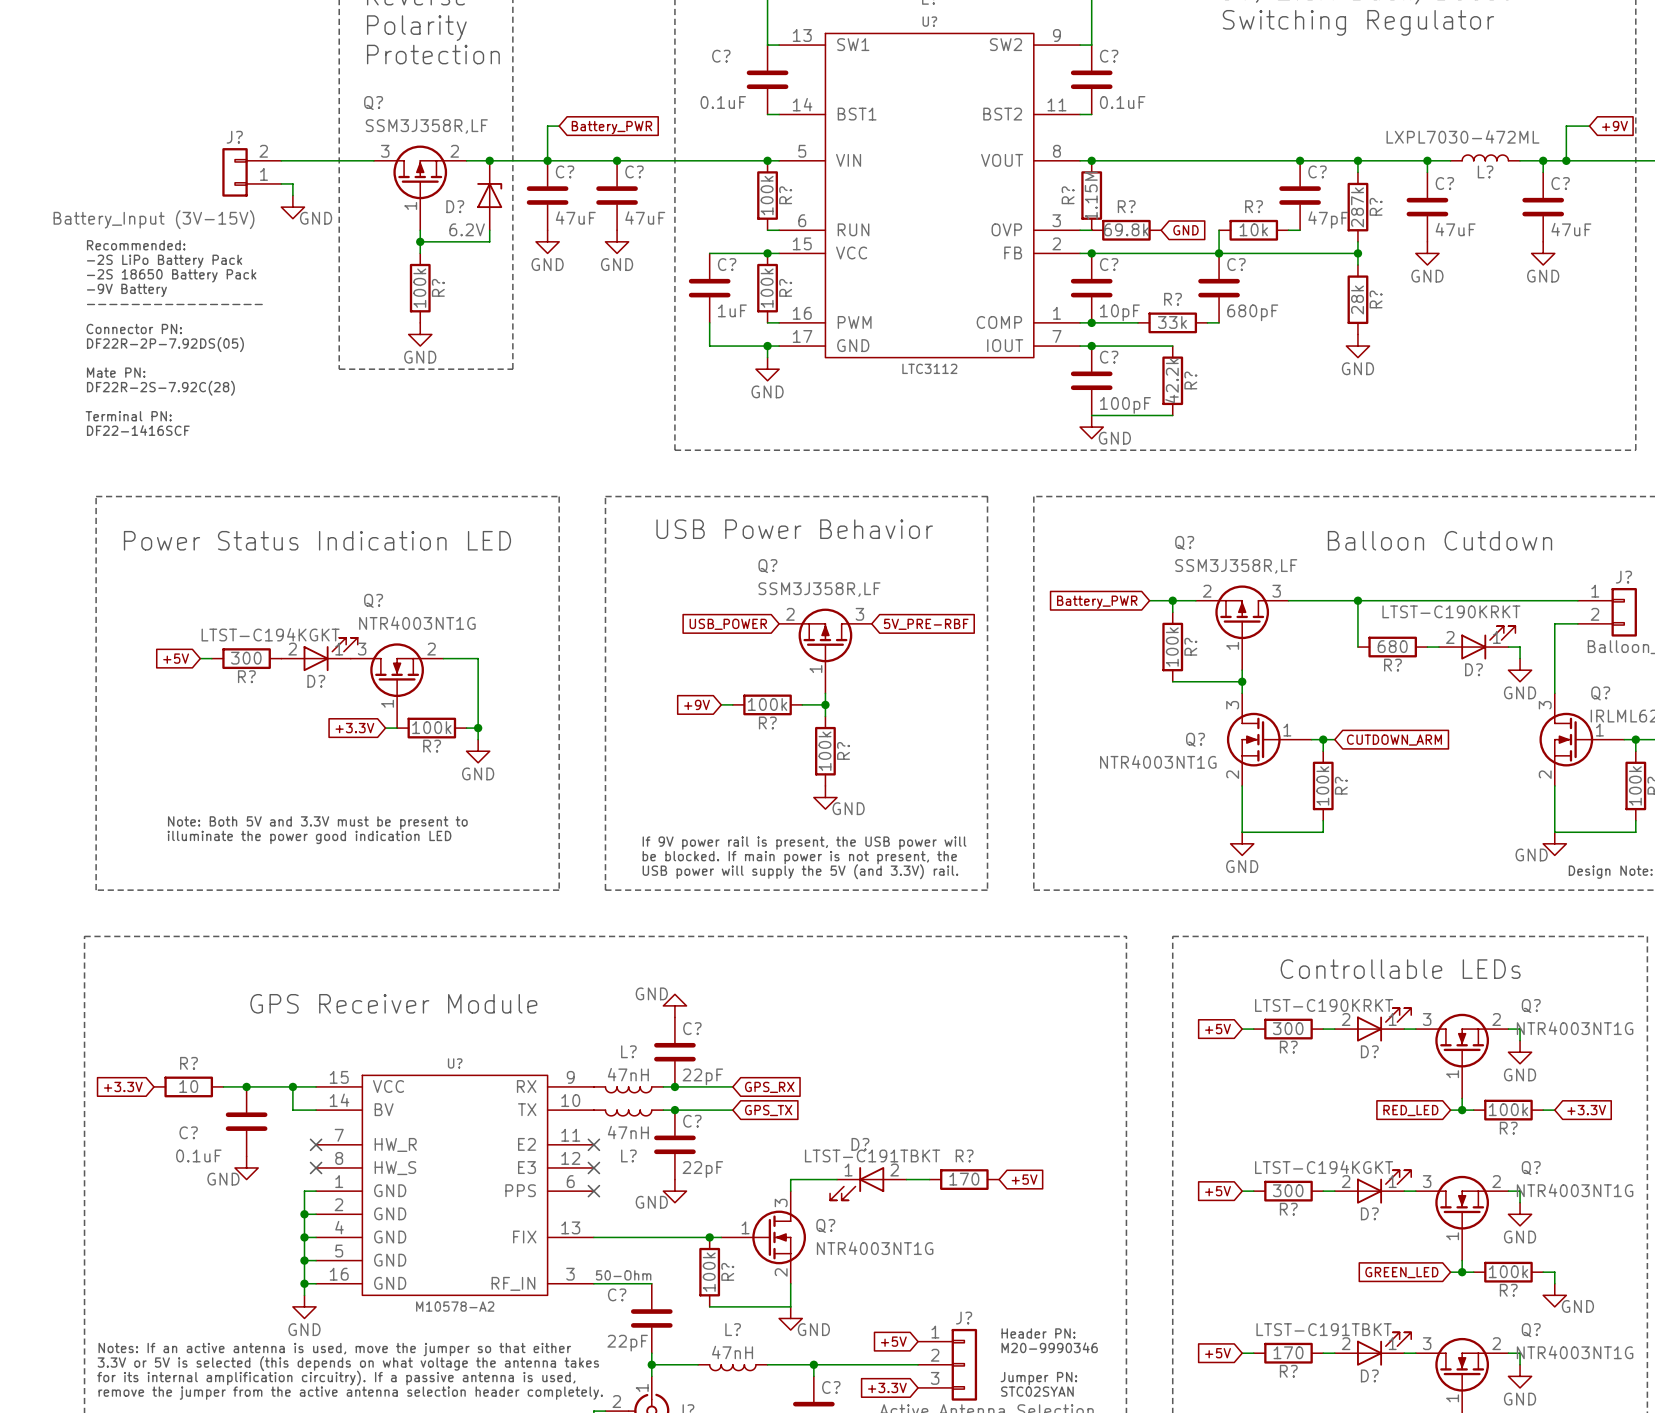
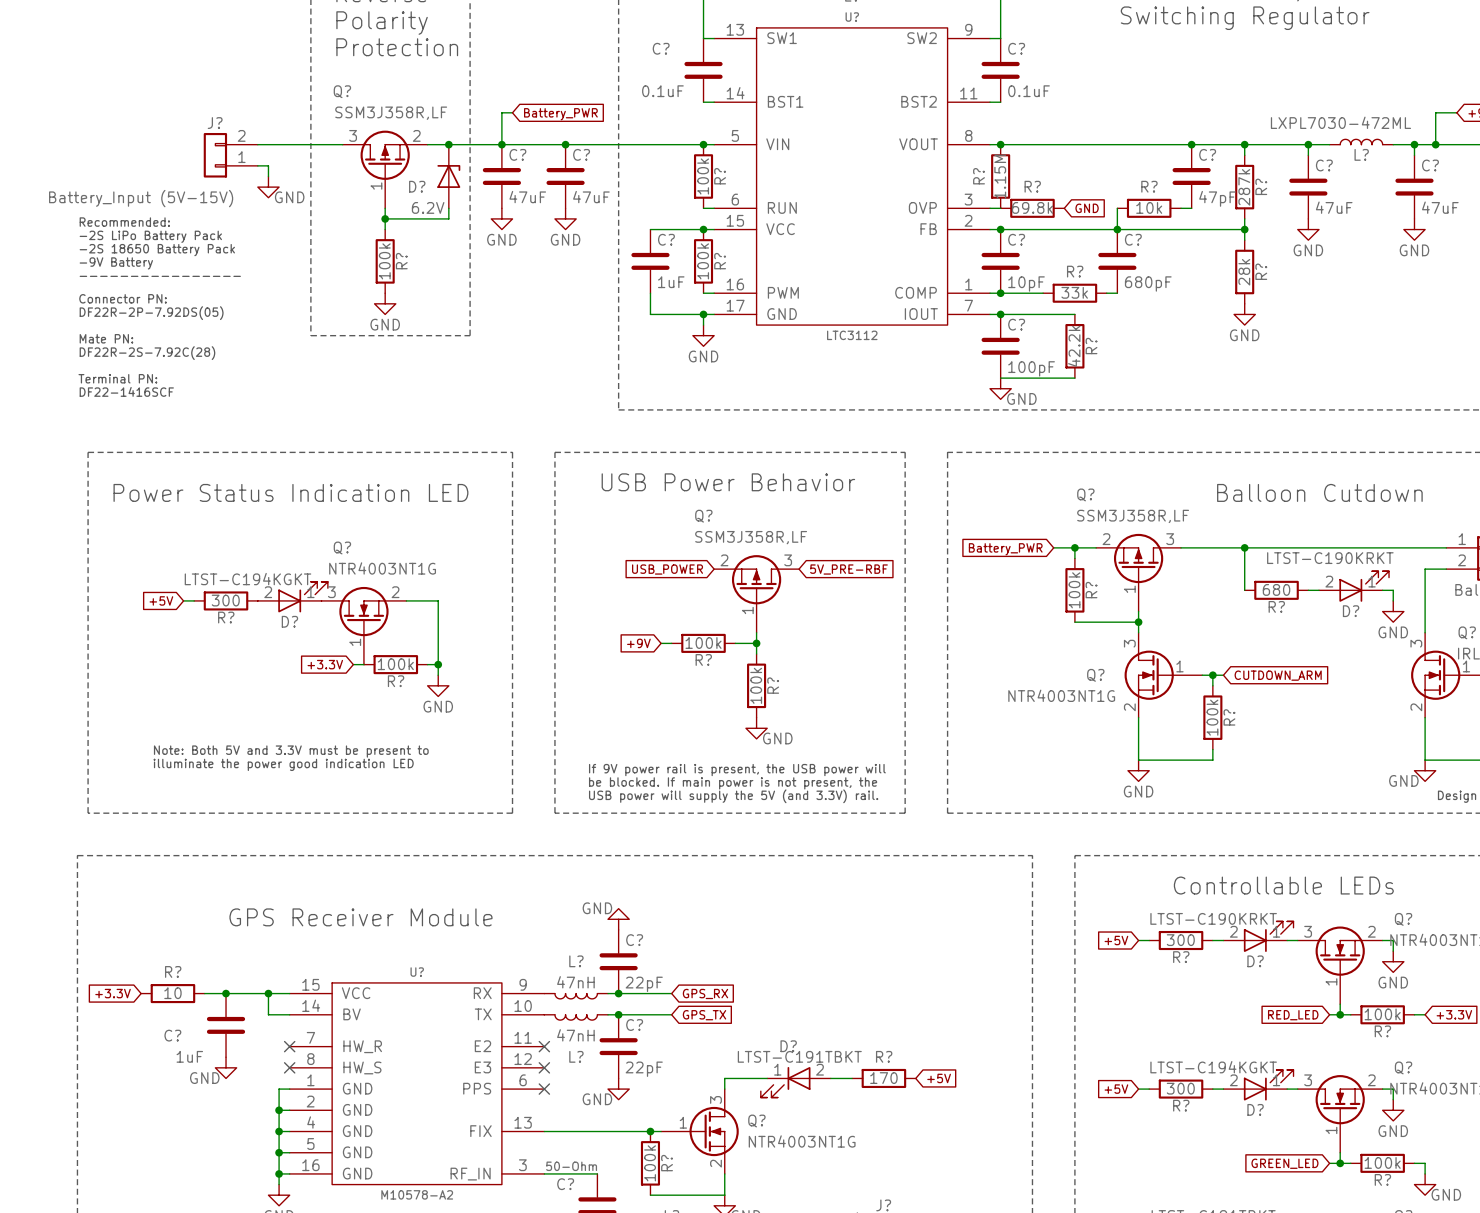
J? value: Battery_Input (3V-15V) (153, 219) -> Battery_Input (5V-15V) (141, 198)
C? value: 0.1uF (198, 1155) -> 1uF (189, 1056)

